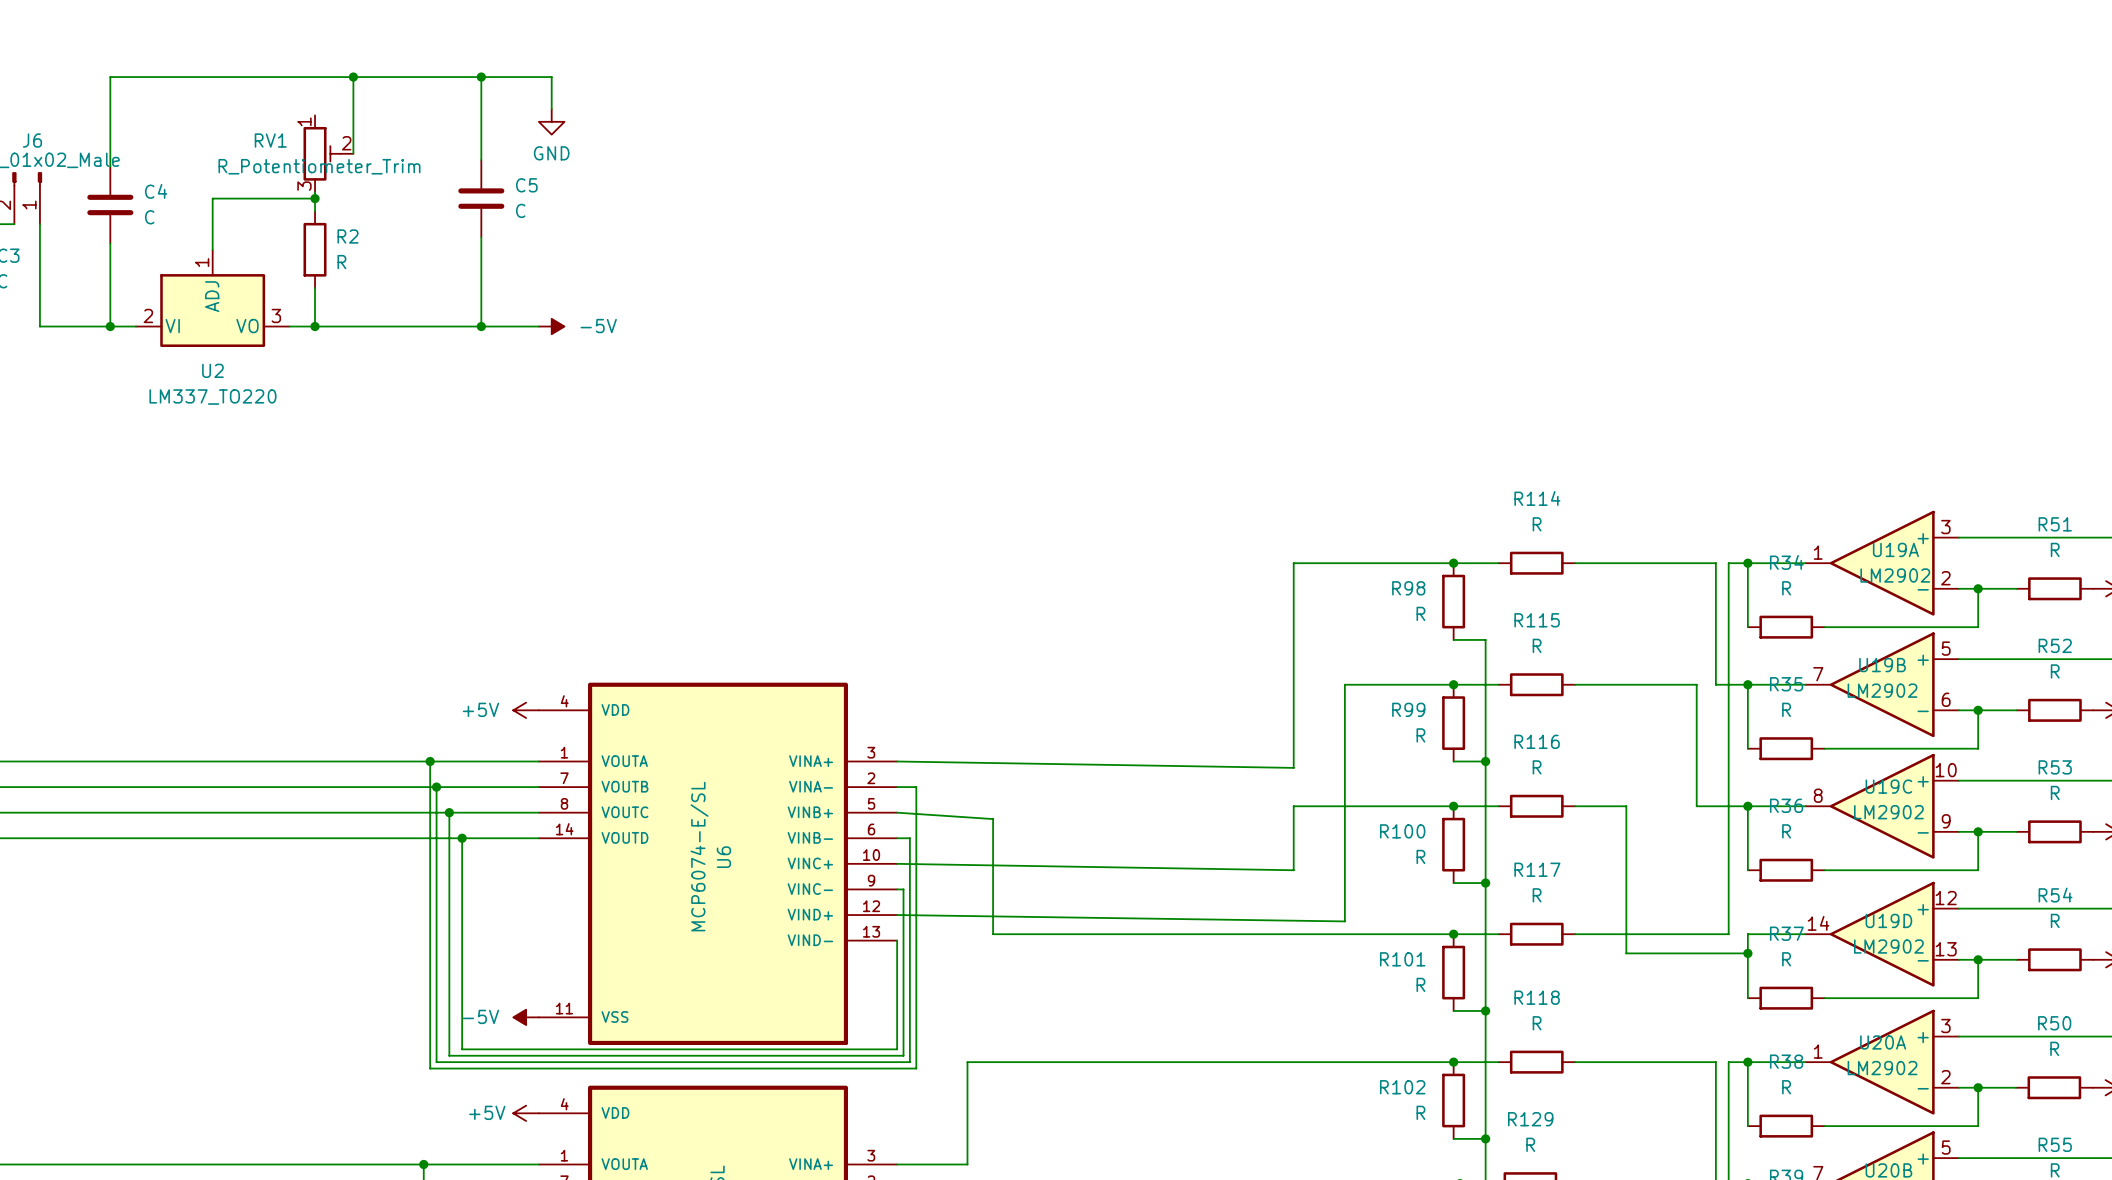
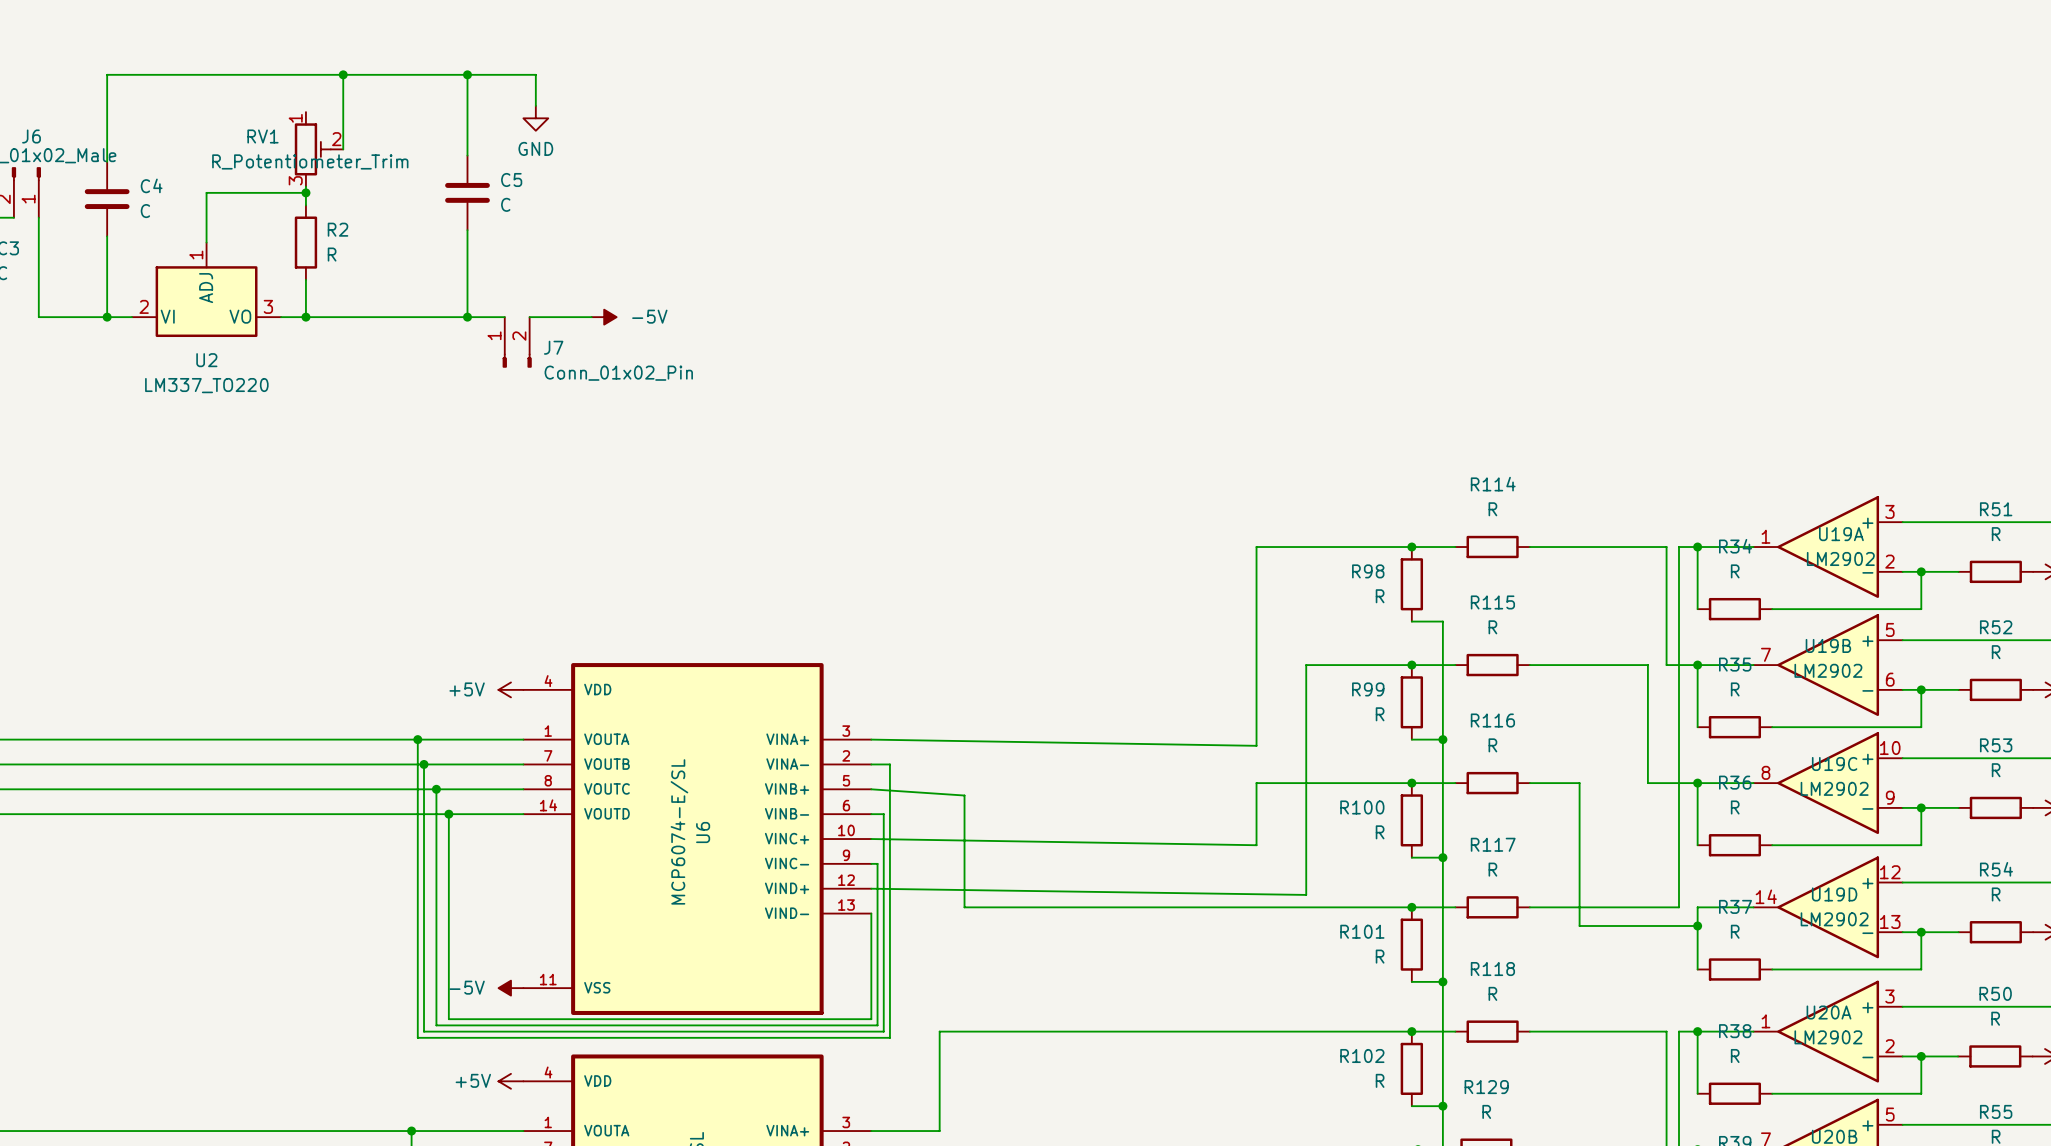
wire: (519, 326) (538, 326) -> none
wire: none -> (529, 317) (591, 317)
power symbol position: -5V (551, 326) -> -5V (604, 317)
J7: none -> Conn_01x02_Pin (517, 342)

